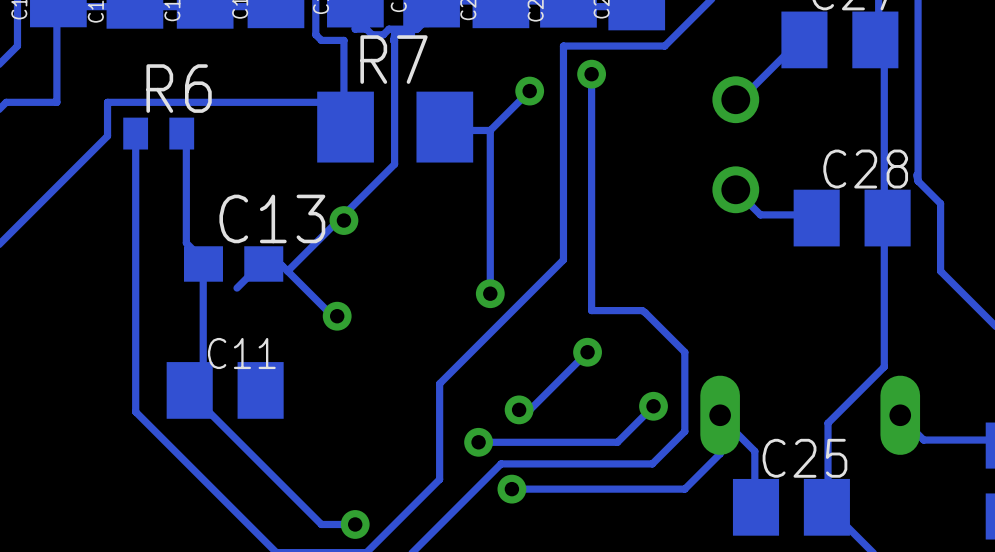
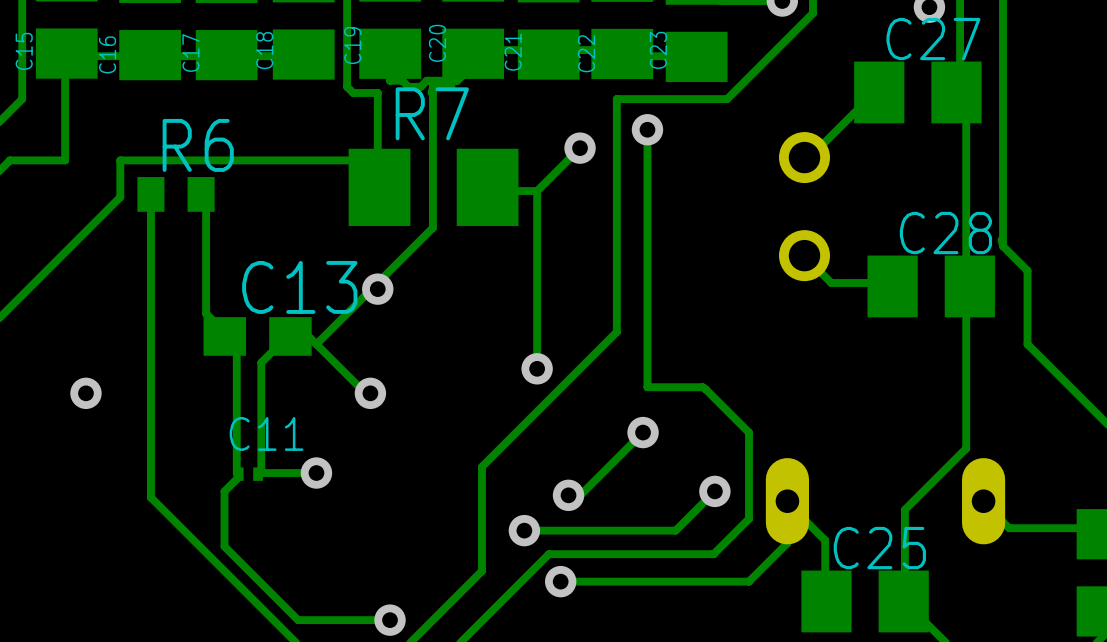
track: (203, 263) (203, 406) (189, 390) (191, 395) (321, 524) -> (224, 336) (230, 338) (236, 344) (236, 473) (238, 474) (236, 479) (224, 491) (224, 546) (298, 620) (353, 620)
track: none -> (261, 362) (261, 473)
via: none -> (85, 393)
C11 footprint: [166, 362, 284, 419] -> [233, 467, 263, 481]
track: none -> (316, 473) (261, 473)
via: none -> (316, 473)

